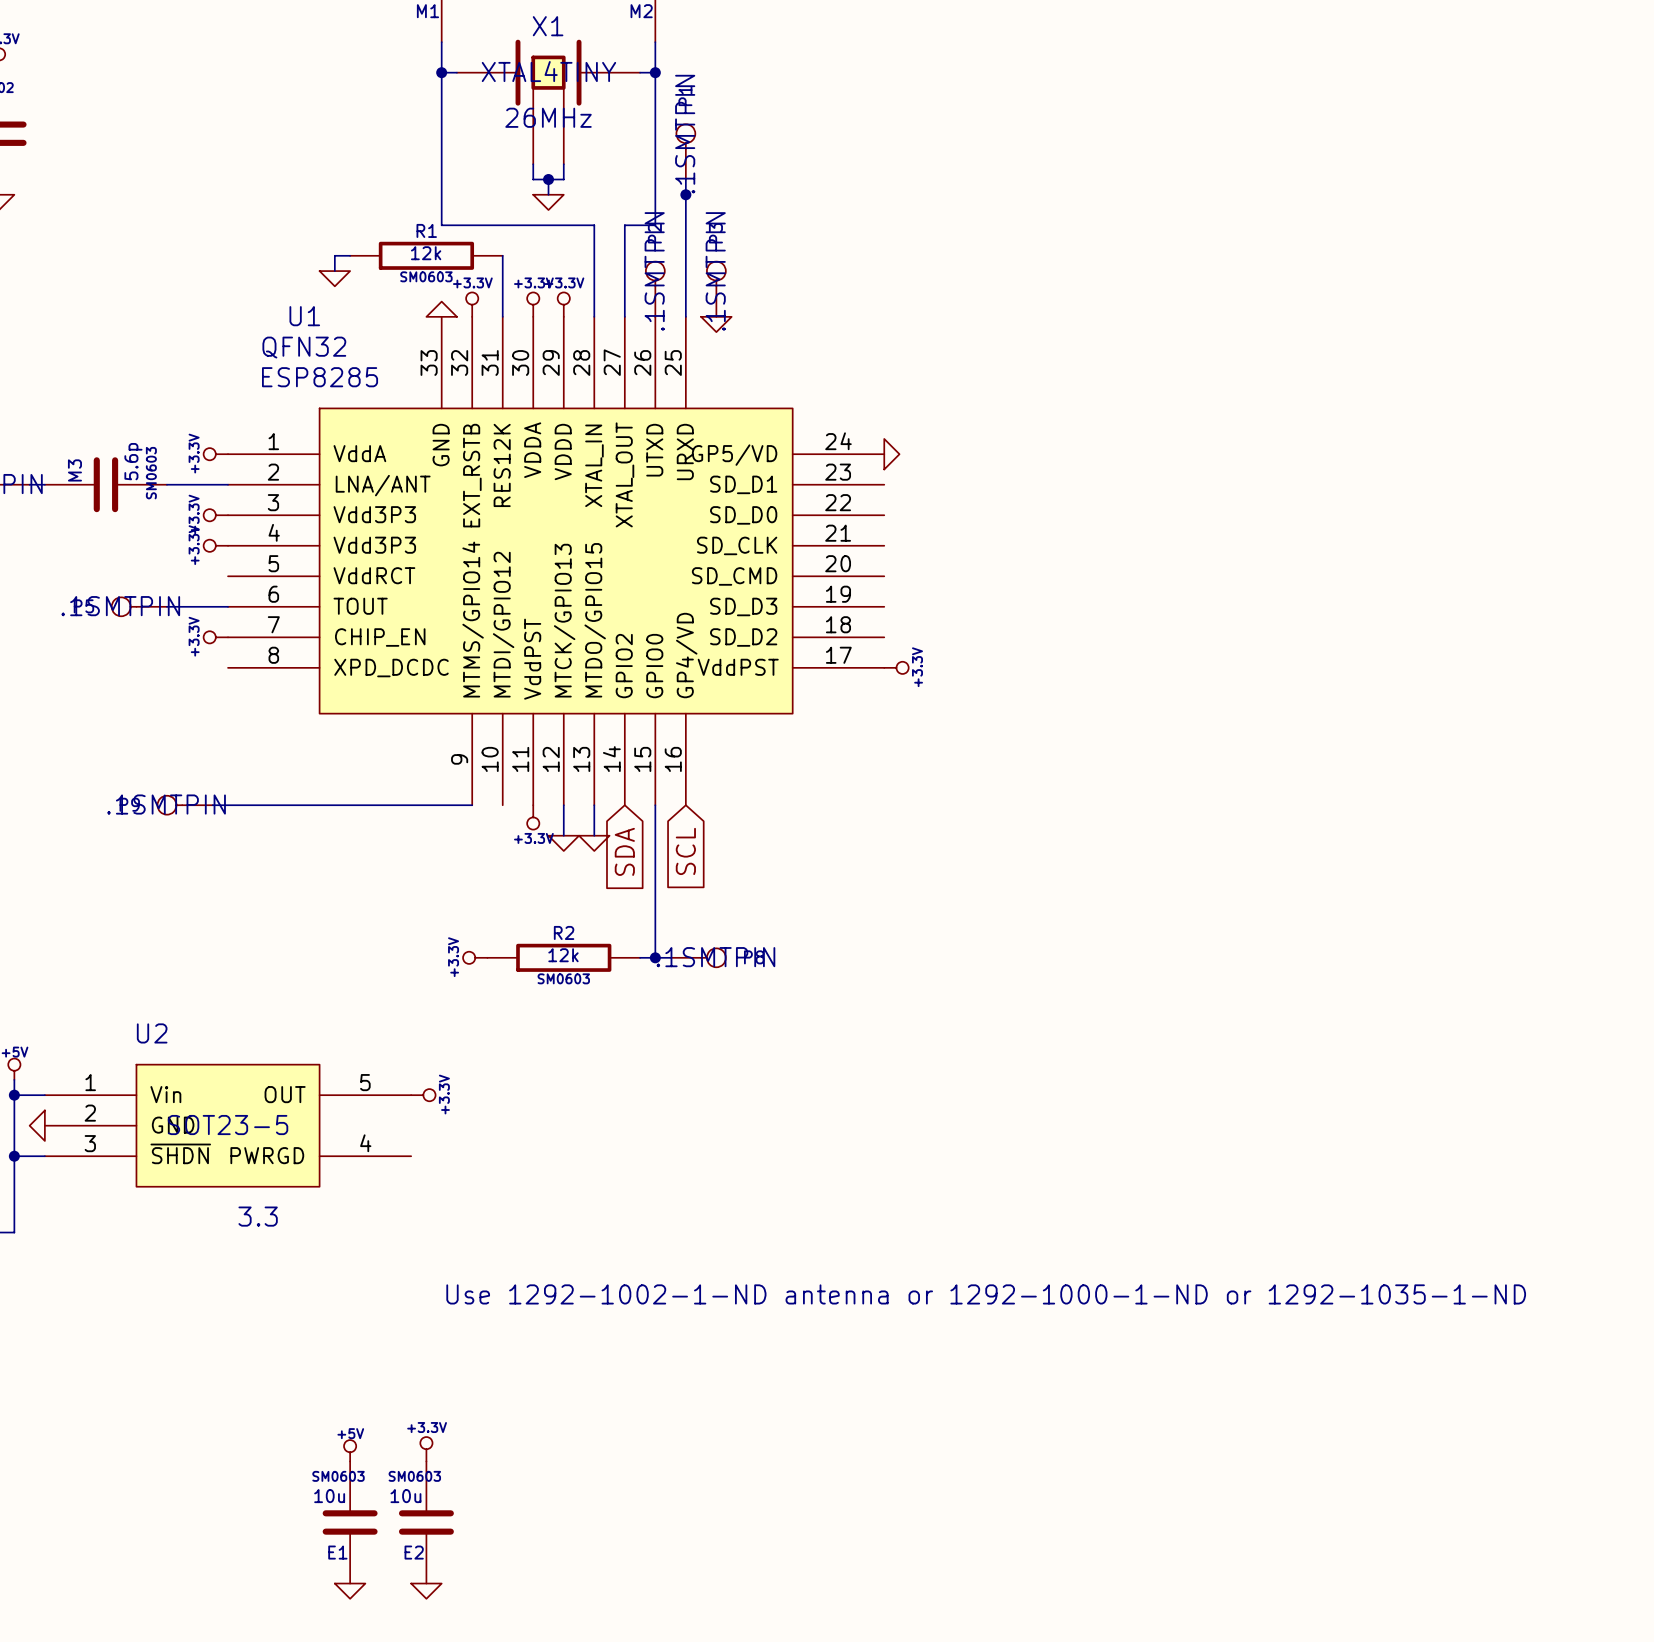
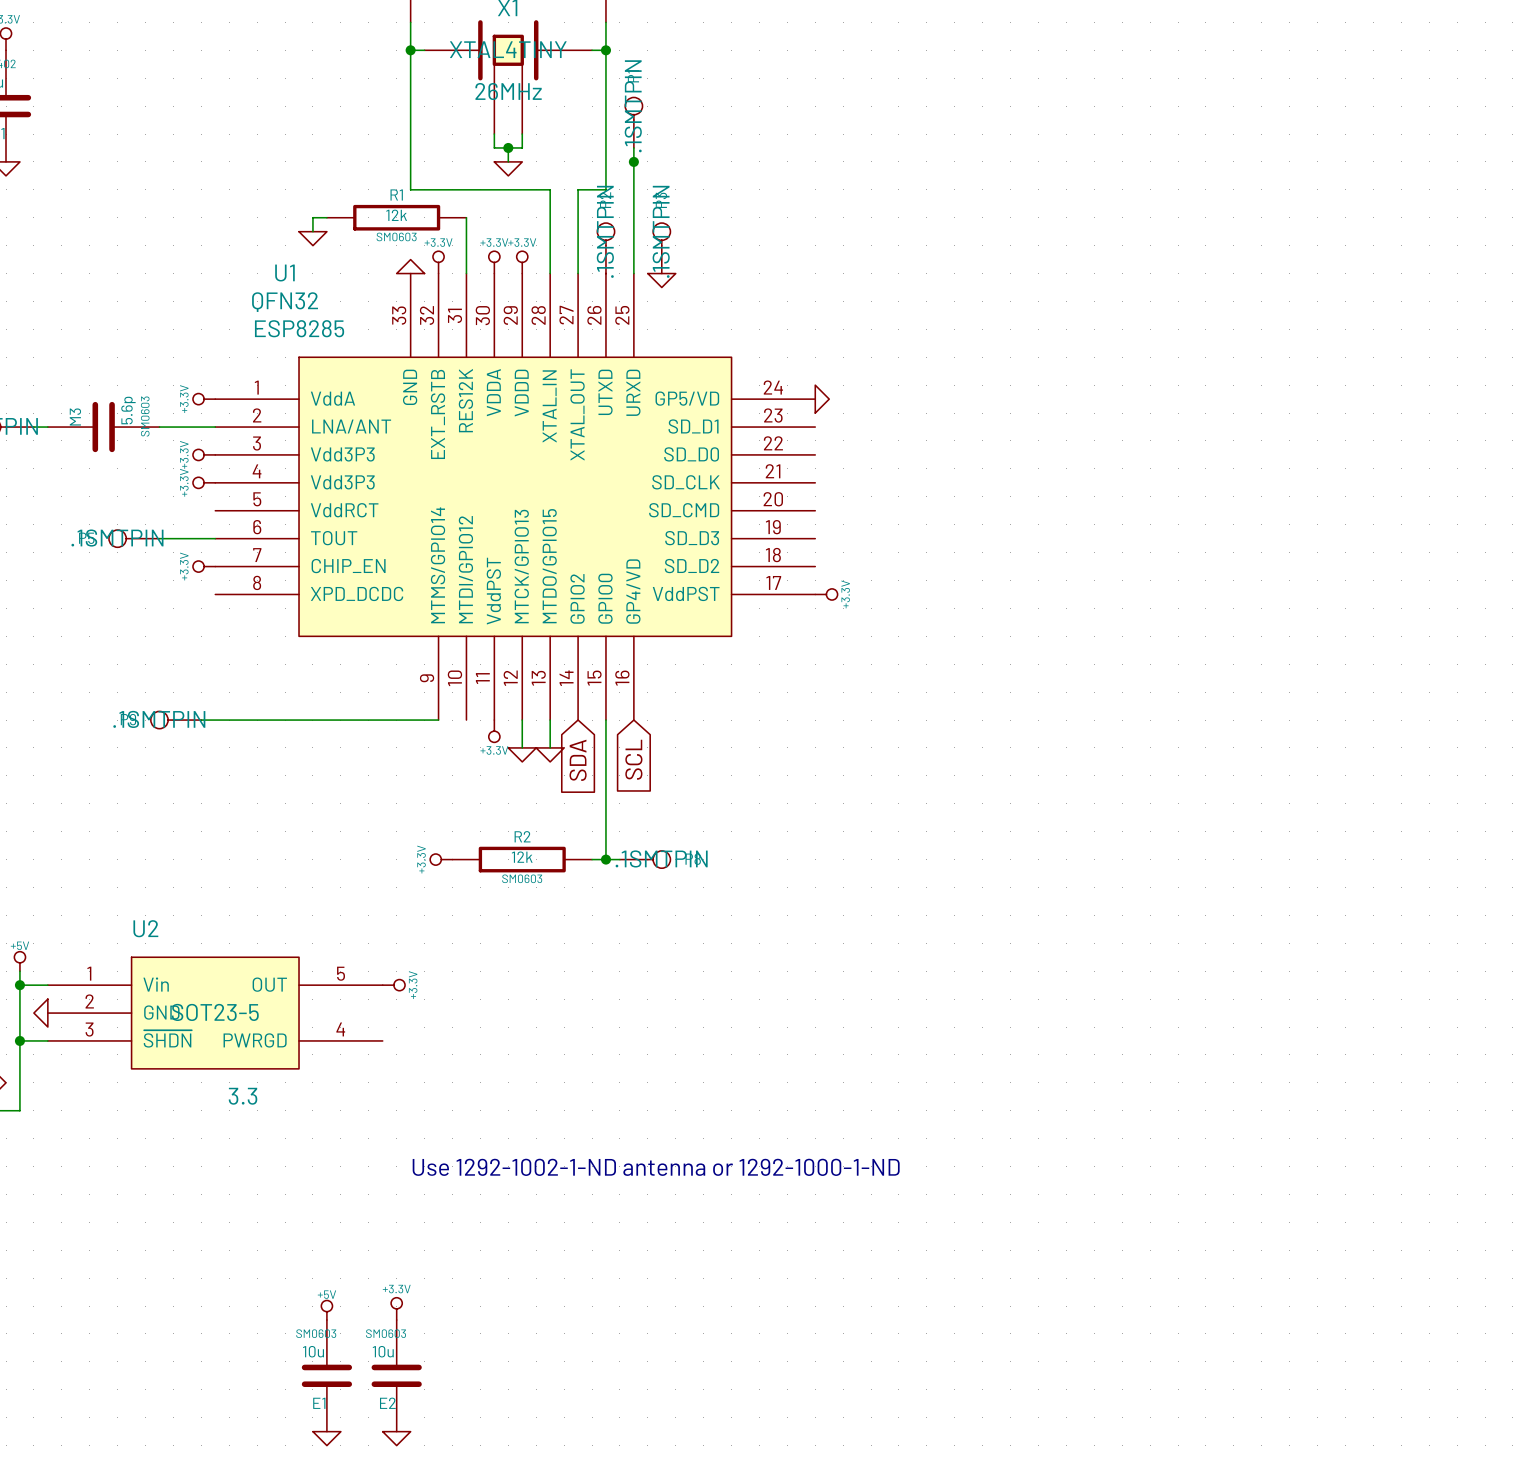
text: Use 1292-1002-1-ND antenna or 1292-1000-1-ND or 1292-1035-1-ND (986, 1294) -> Use 1292-1002-1-ND antenna or 1292-1000-1-ND (656, 1167)

